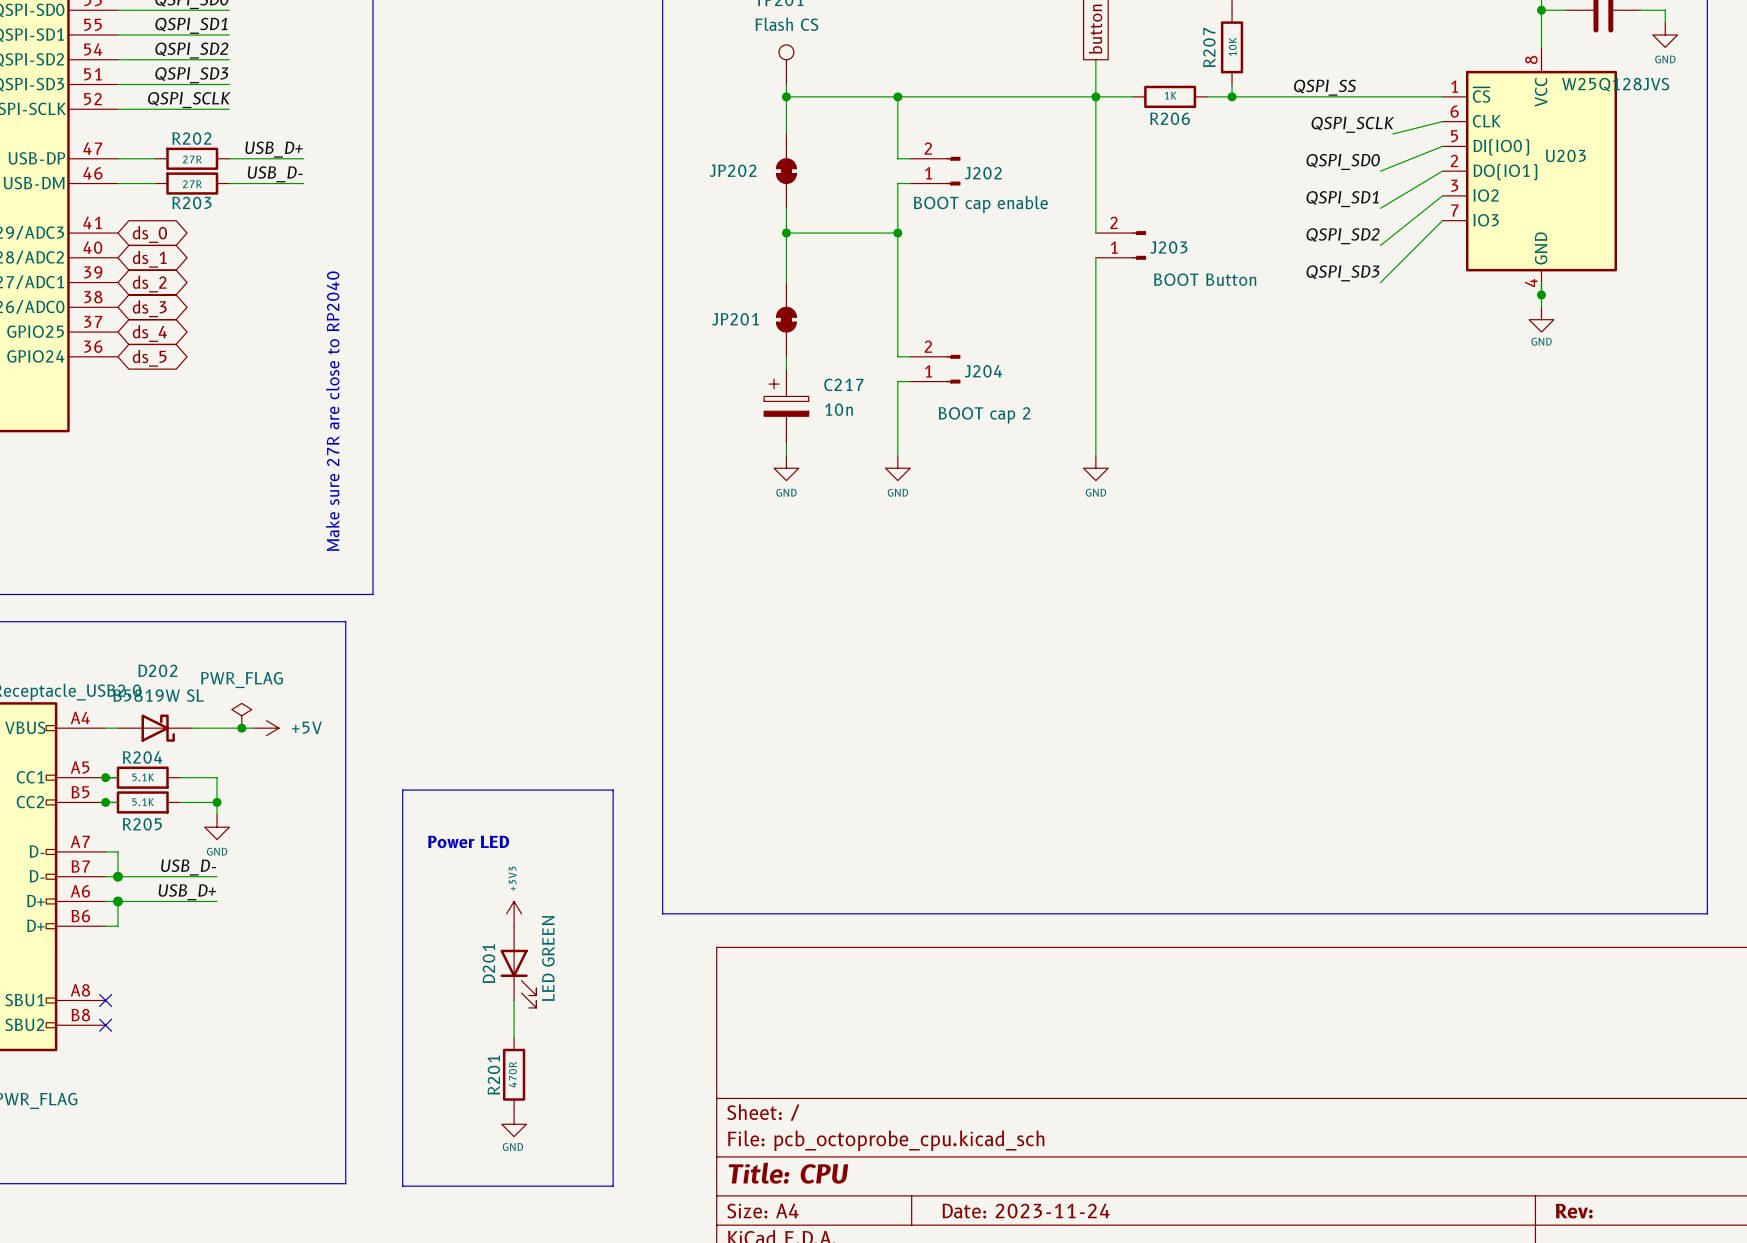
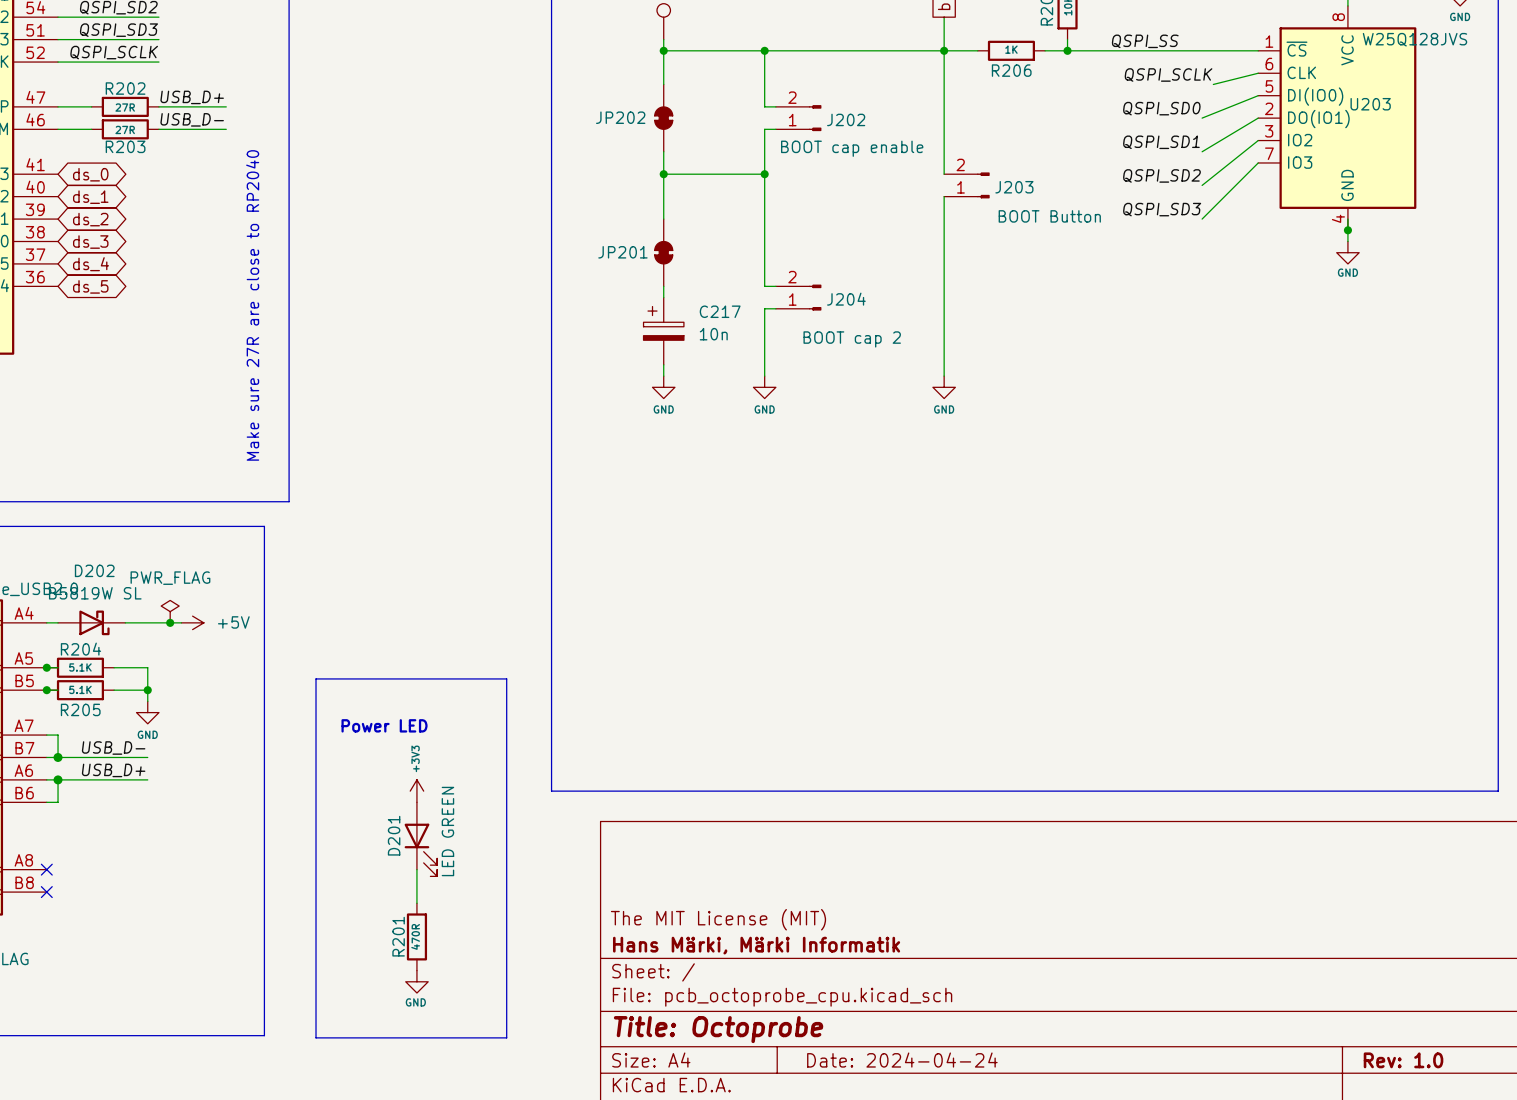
title block: none -> The MIT License (MIT) (718, 919)
title block: none -> Hans Märki, Märki Informatik (756, 945)
title block: Title: CPU (788, 1173) -> Title: Octoprobe (718, 1029)
title block: Date: 2023-11-24 (1026, 1211) -> Date: 2024-04-24 (902, 1060)
title block: Rev: (1574, 1211) -> Rev: 1.0 (1403, 1060)

